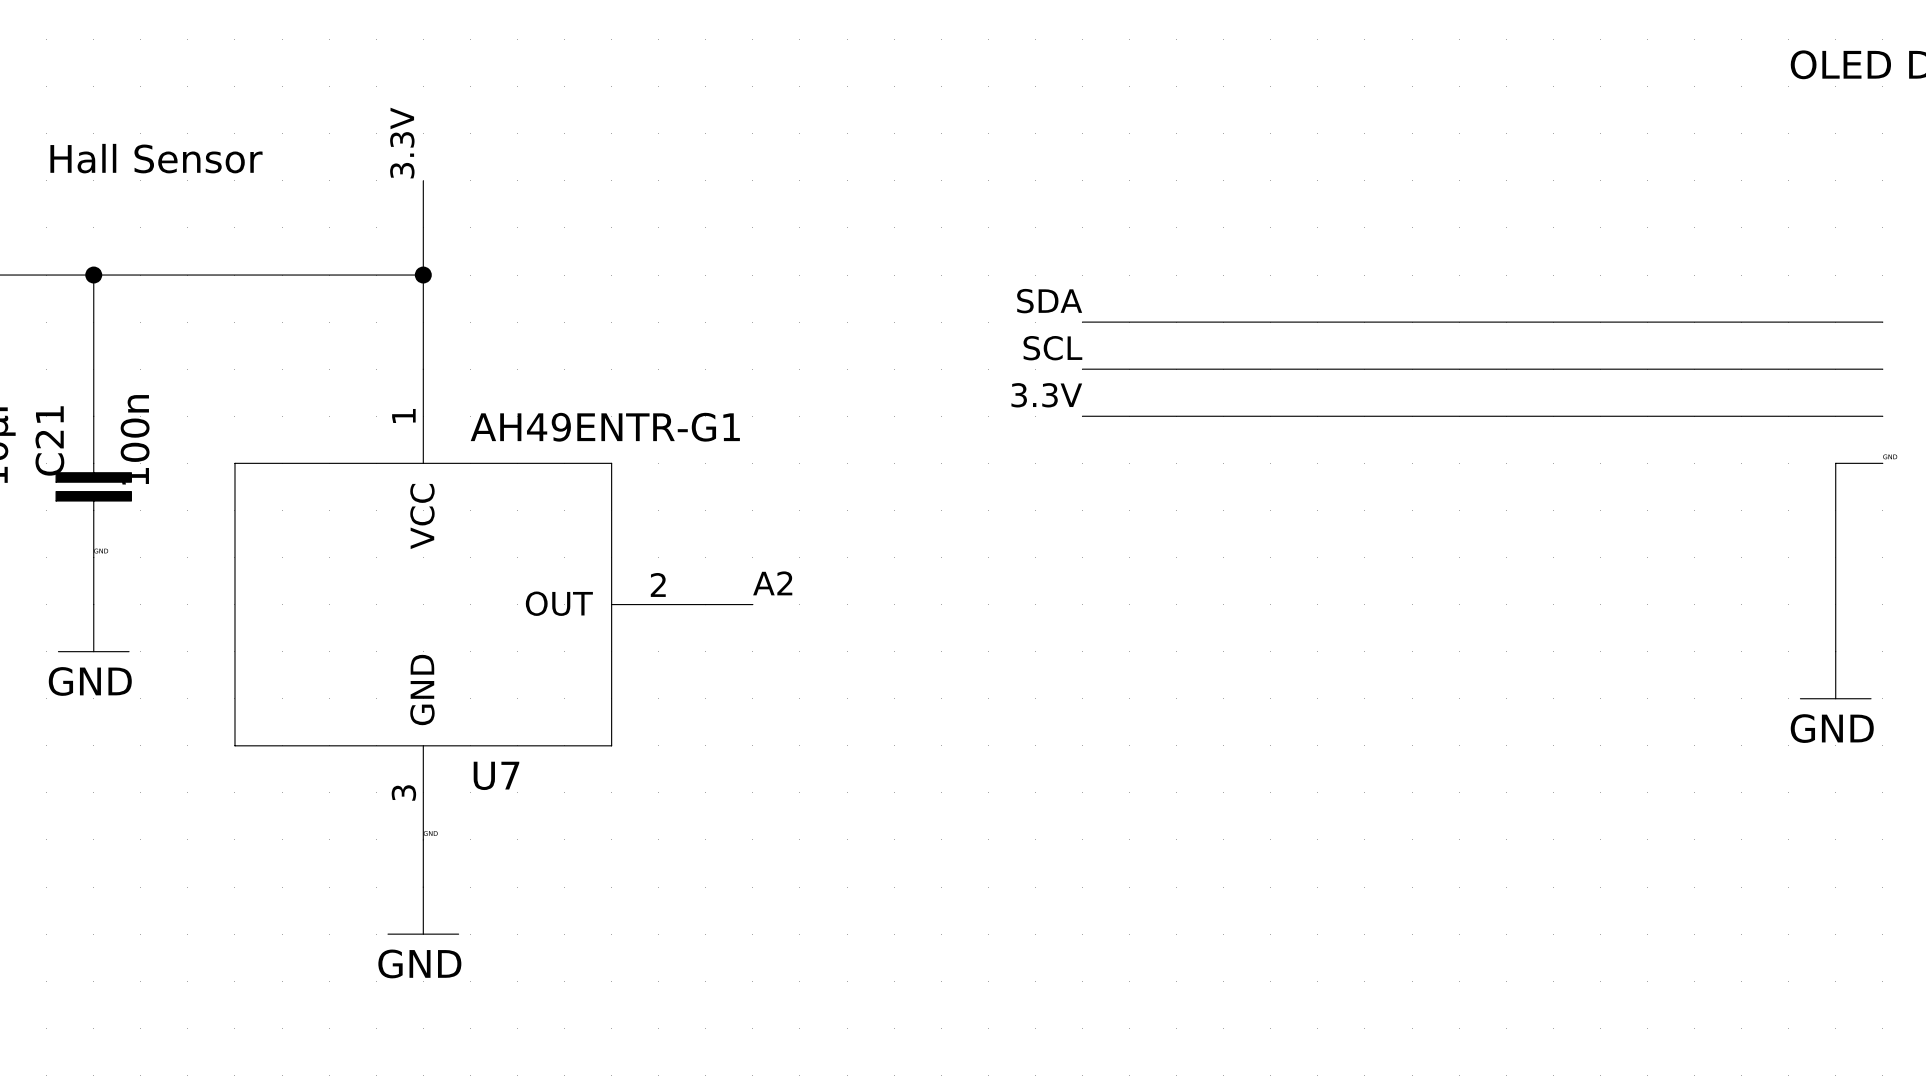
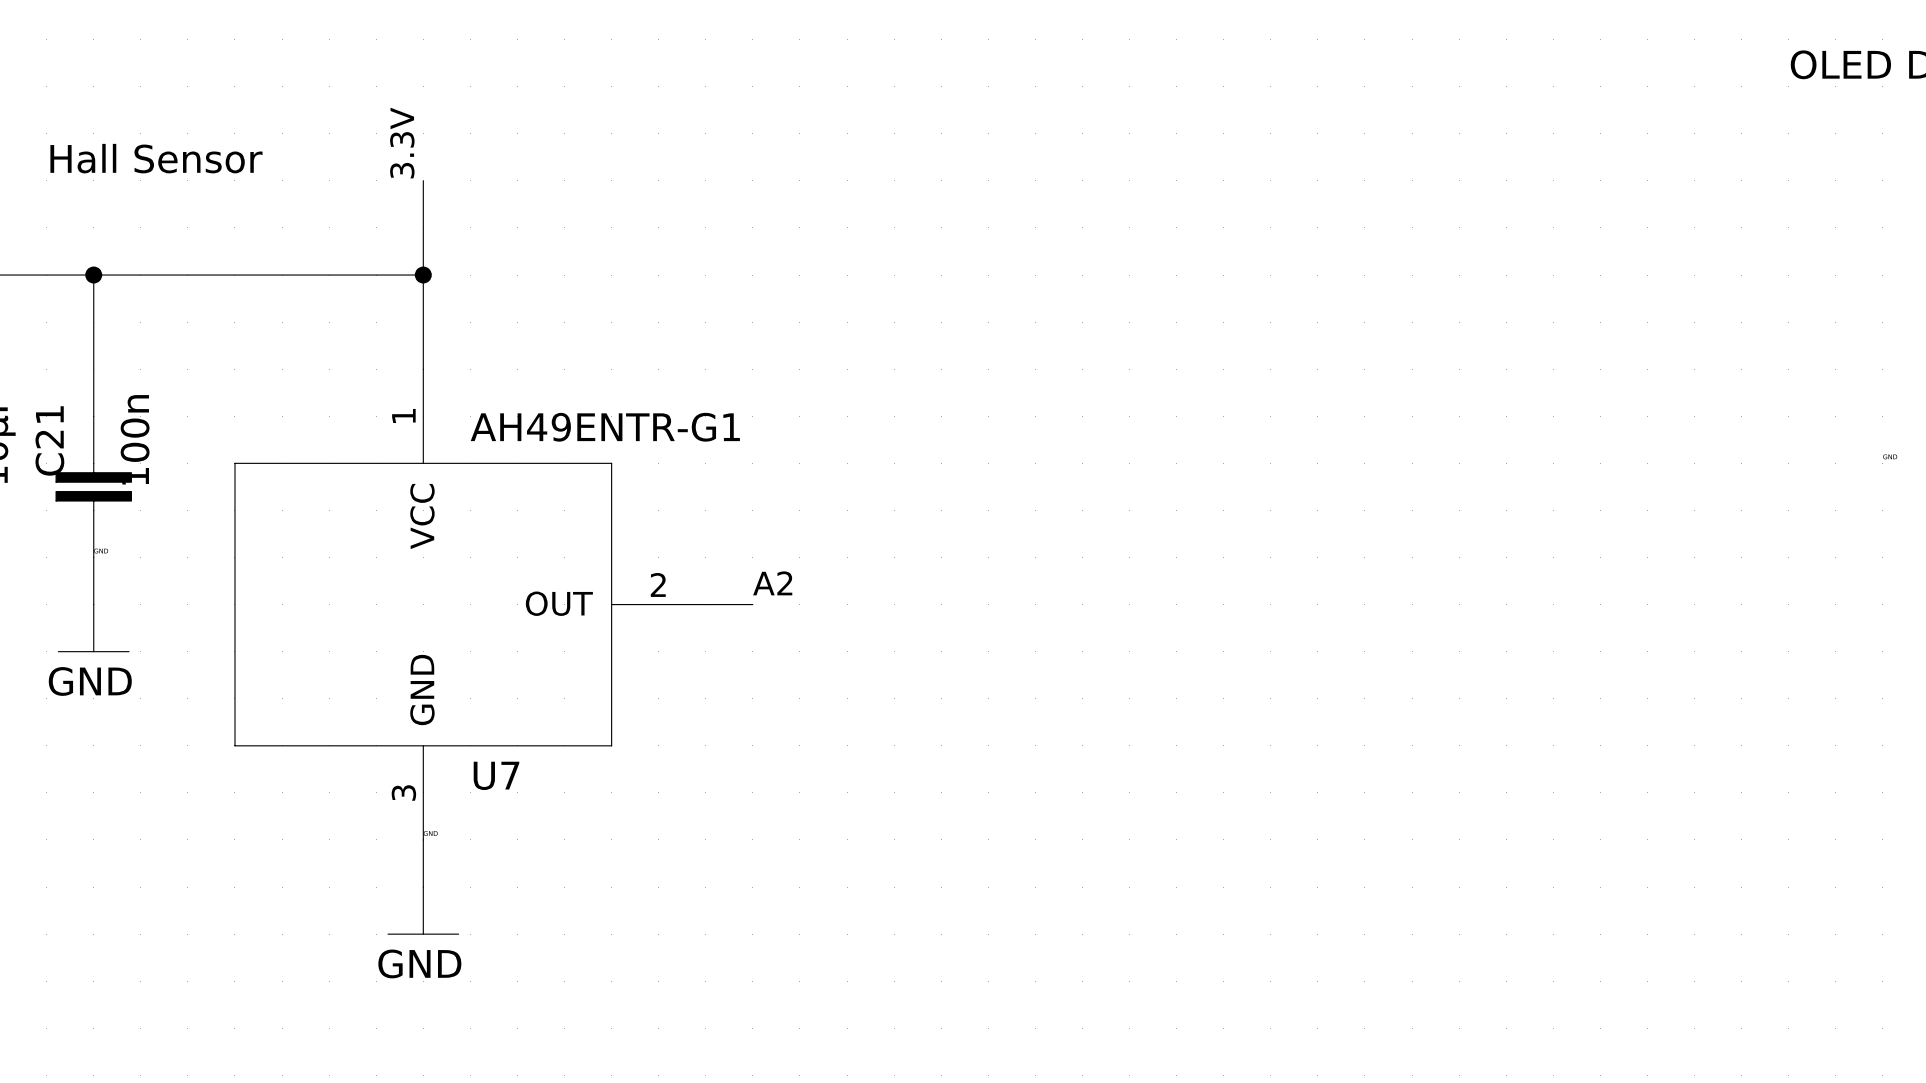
label: SDA (1049, 301) -> none
wire: (1082, 322) (1882, 322) -> none
label: SCL (1052, 348) -> none
wire: (1082, 369) (1882, 369) -> none
label: 3.3V (1046, 395) -> none
wire: (1082, 416) (1882, 416) -> none
wire: (1882, 463) (1835, 463) (1835, 651) -> none
power symbol: GND (1835, 675) -> none

